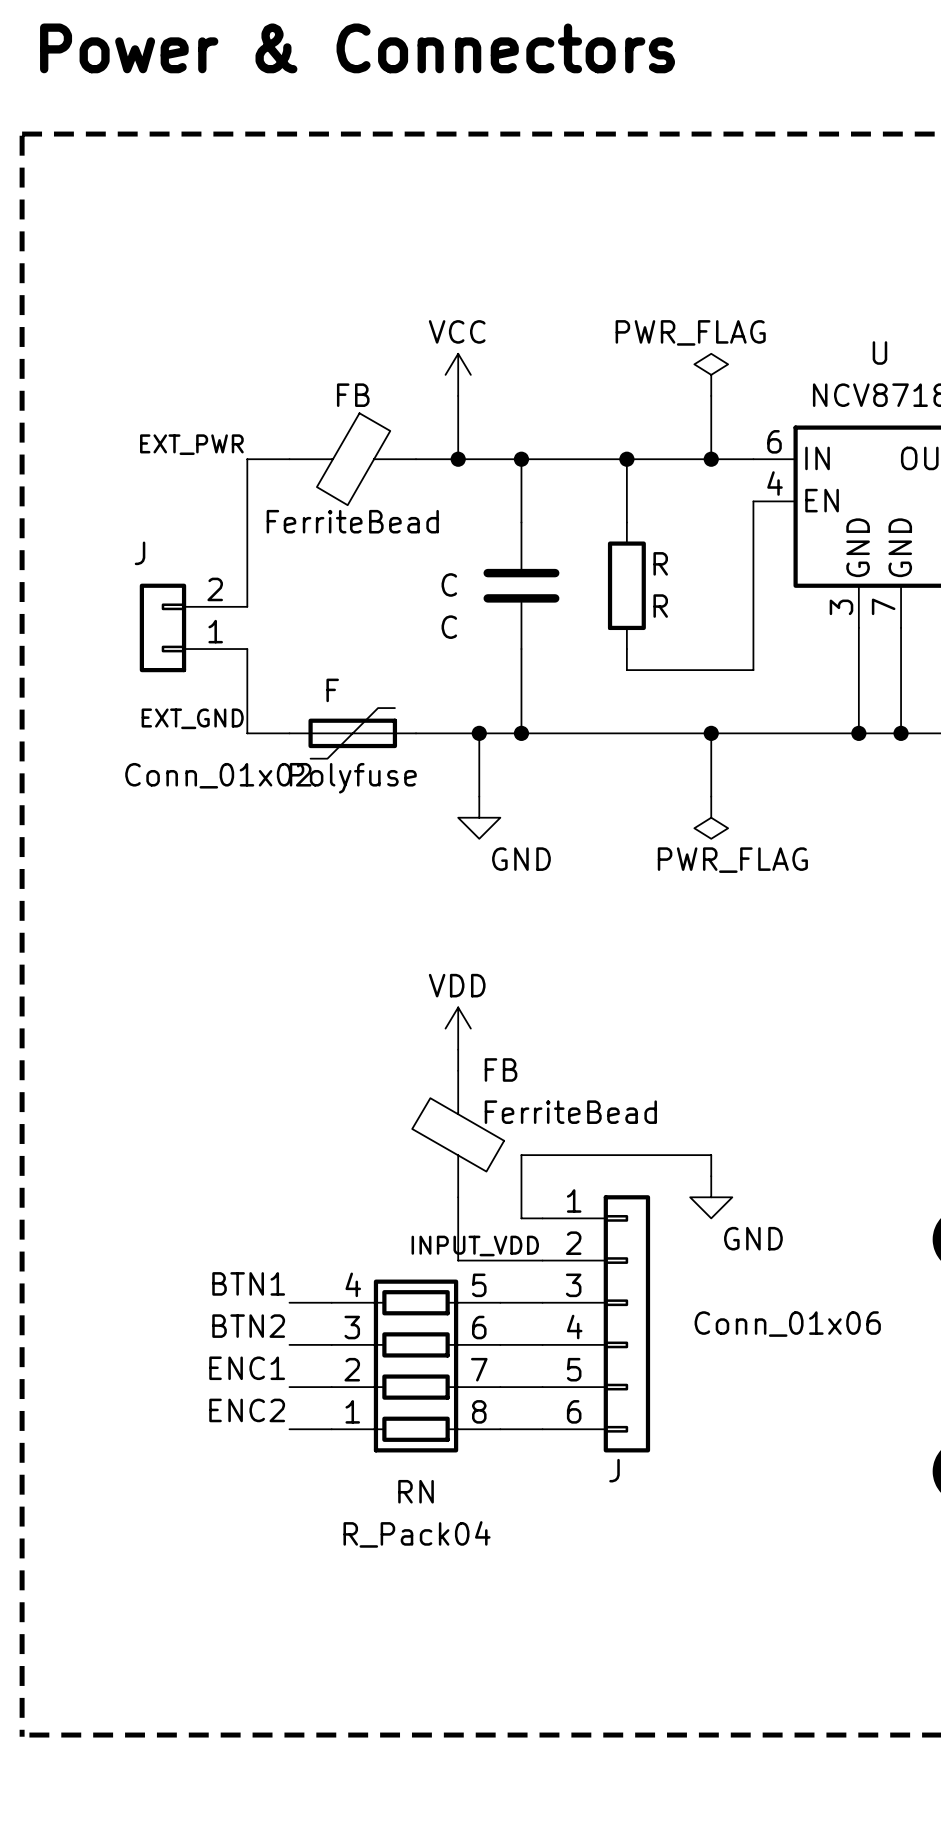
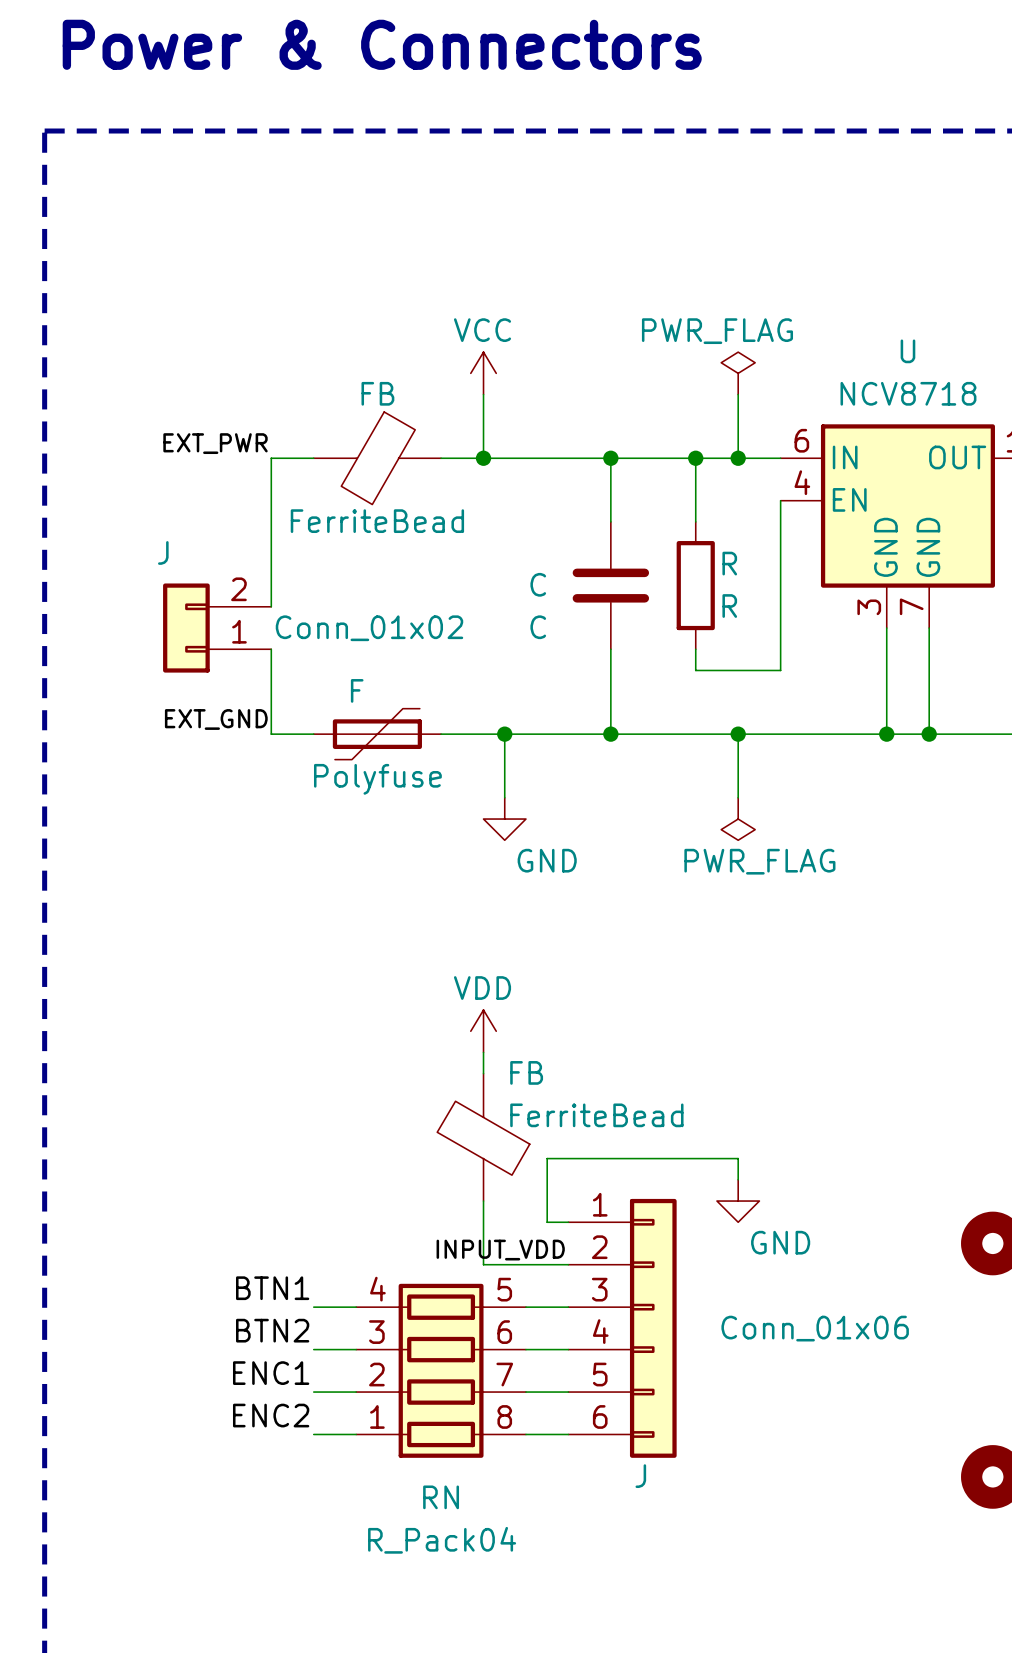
wire: (521, 459) (521, 522) -> (610, 458) (610, 521)
junction: (521, 459) -> none
junction: none -> (610, 458)
wire: (626, 459) (626, 522) -> (695, 458) (695, 521)
junction: (626, 459) -> none
junction: none -> (695, 458)
C position: (521, 585) -> (610, 585)
R position: (626, 585) -> (695, 585)
wire: (521, 649) (521, 733) -> (610, 649) (610, 734)
wire: (626, 649) (626, 670) (669, 670) -> (695, 649) (695, 670)
junction position: (521, 733) -> (610, 734)
J value position: Conn_01x02 (218, 775) -> Conn_01x02 (369, 628)

